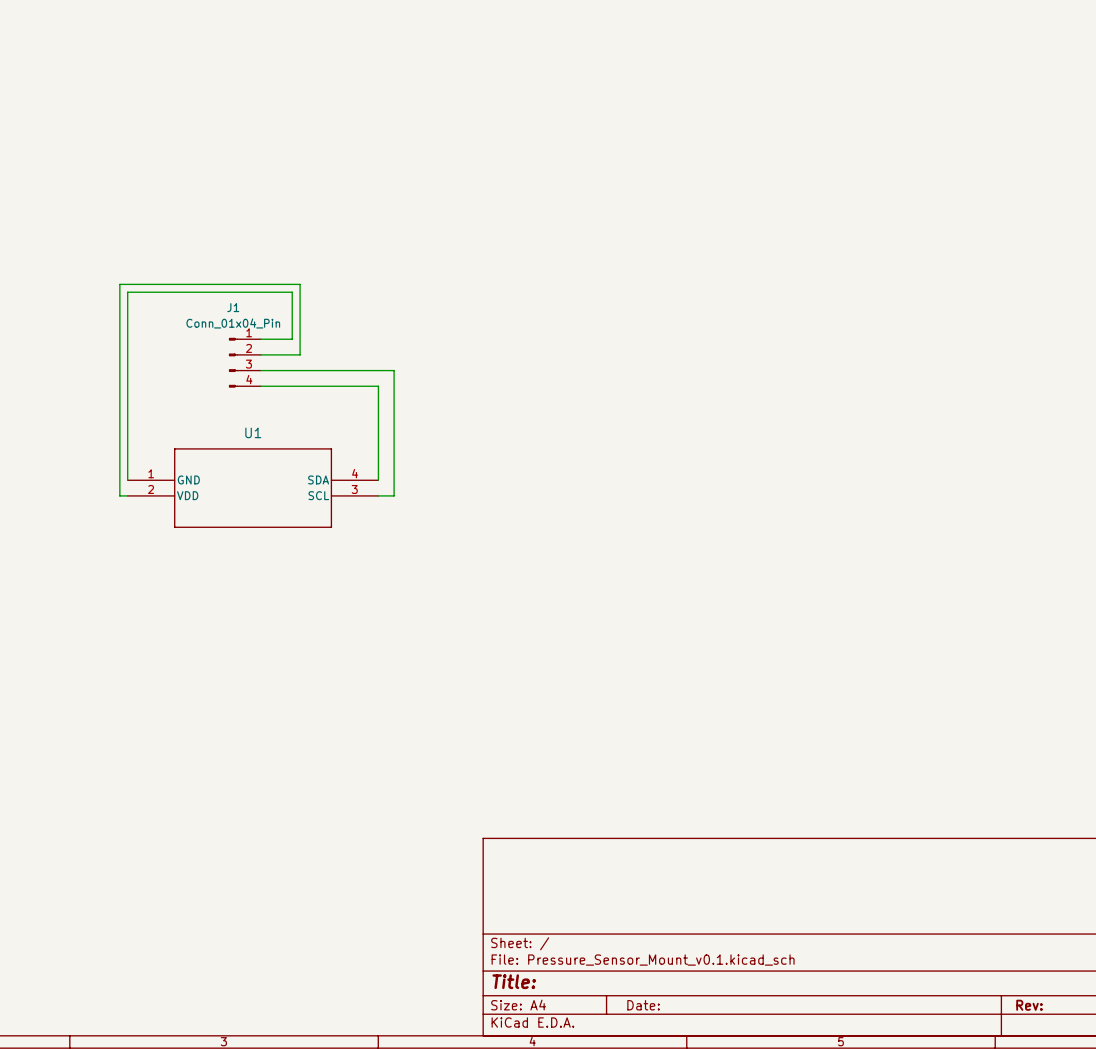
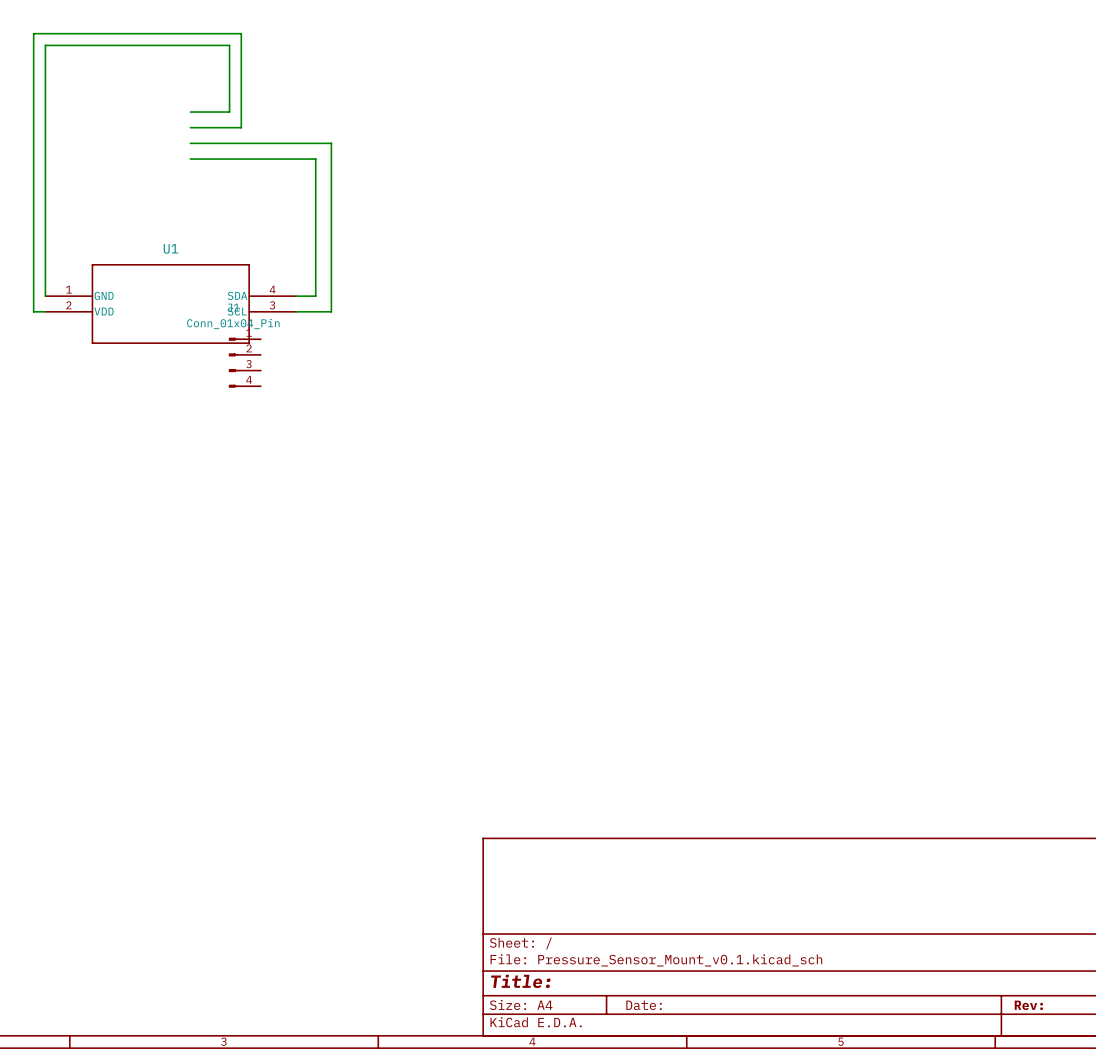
wire: none -> (190, 112) (229, 112) (229, 45) (45, 45) (45, 296)
wire: none -> (190, 127) (241, 127) (241, 33) (33, 33) (33, 311) (45, 311)
wire: none -> (190, 143) (331, 143) (331, 311) (296, 311)
wire: none -> (190, 159) (315, 159) (315, 296) (296, 296)
wire: (260, 339) (292, 339) (292, 292) (127, 292) (127, 480) -> none
wire: (260, 354) (300, 354) (300, 284) (119, 284) (119, 495) (127, 495) -> none
wire: (260, 370) (394, 370) (394, 495) (378, 495) -> none
wire: (260, 386) (378, 386) (378, 480) -> none
U1 position: (253, 488) -> (170, 303)

